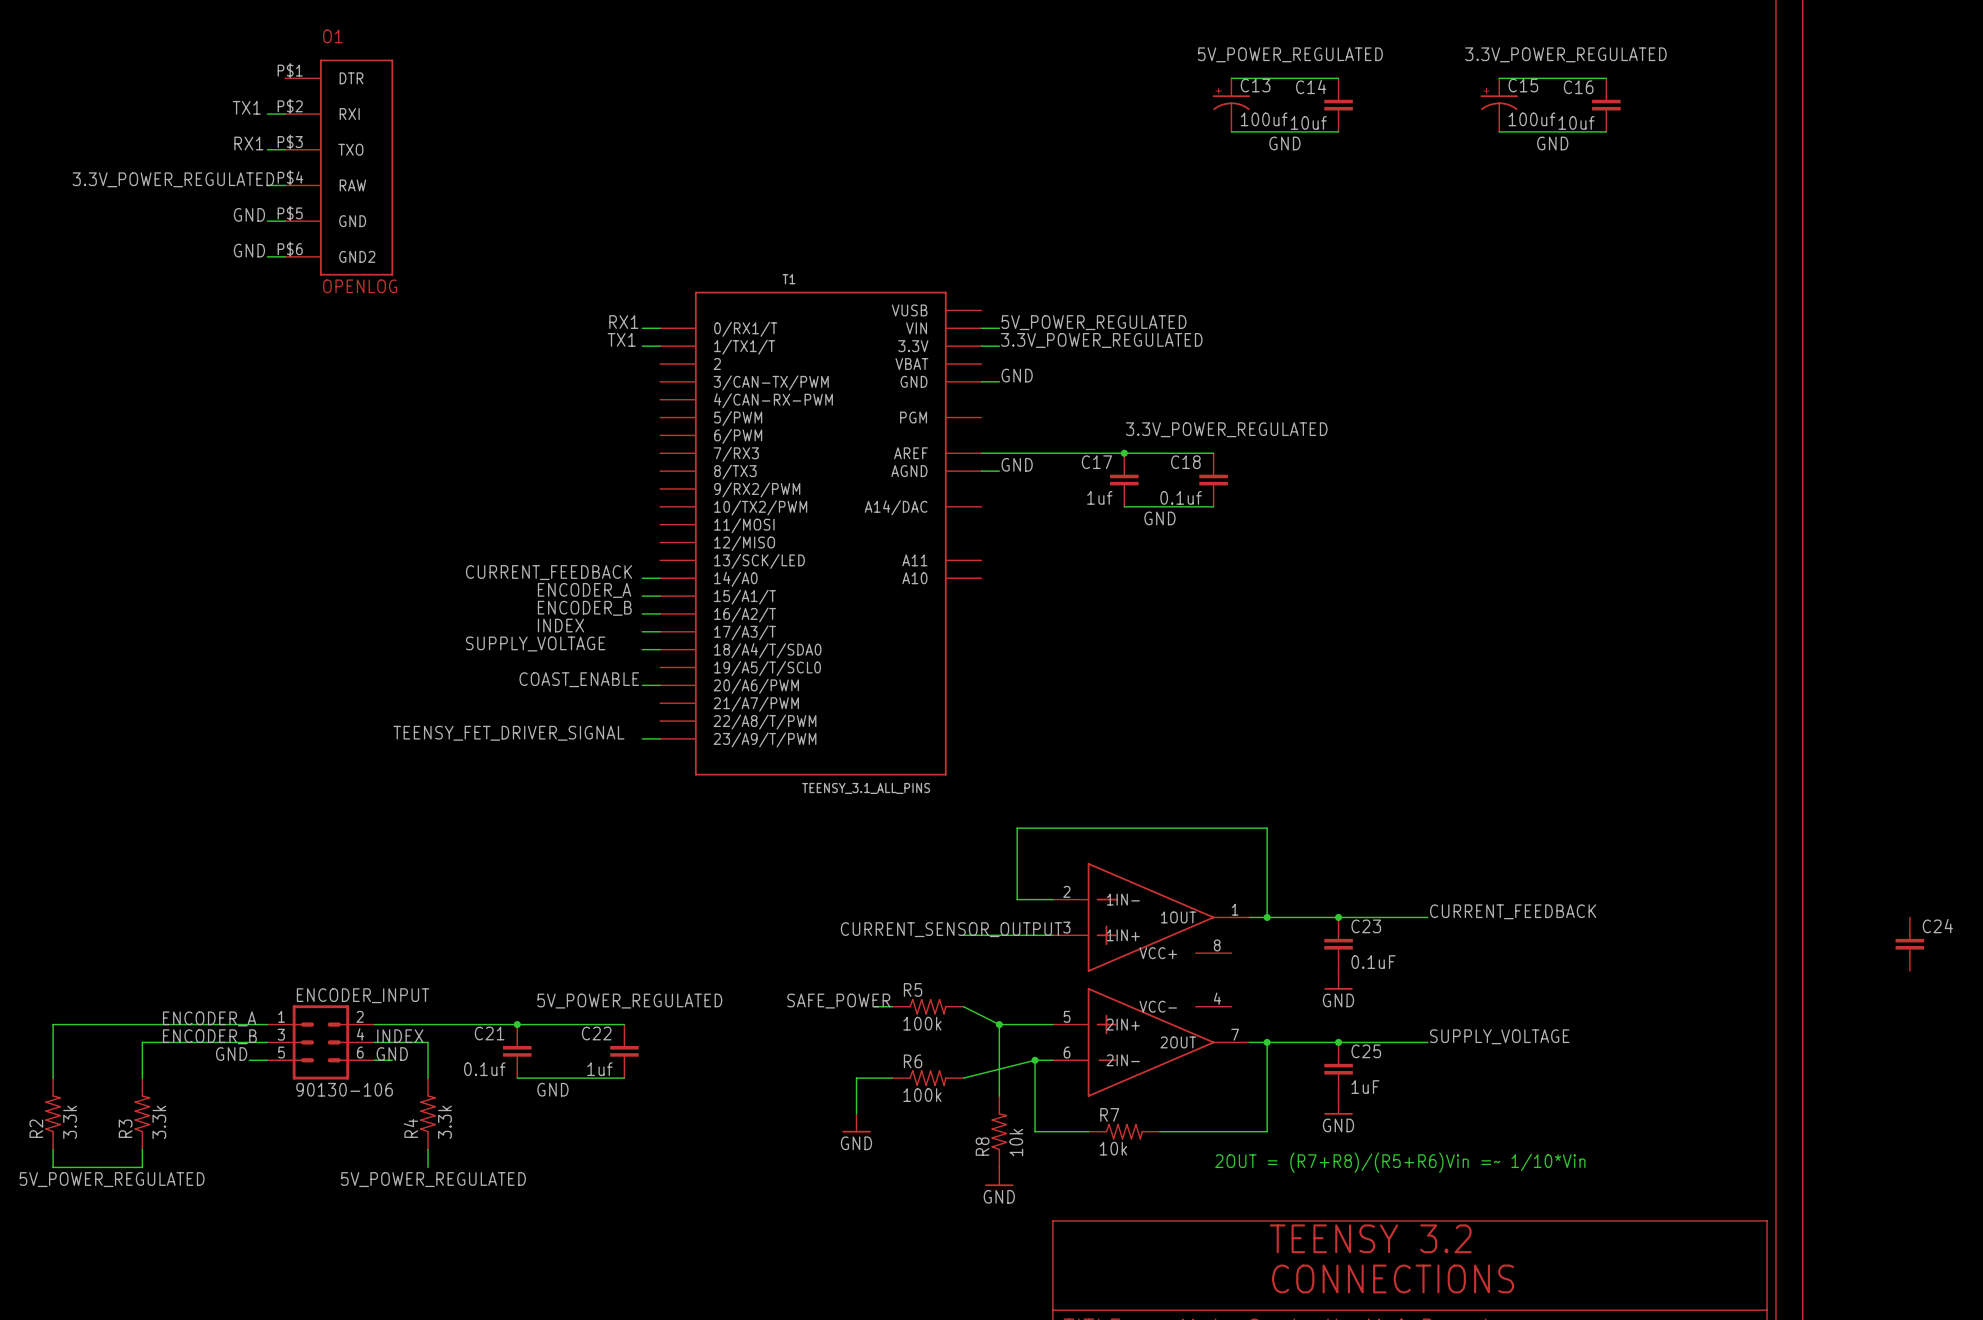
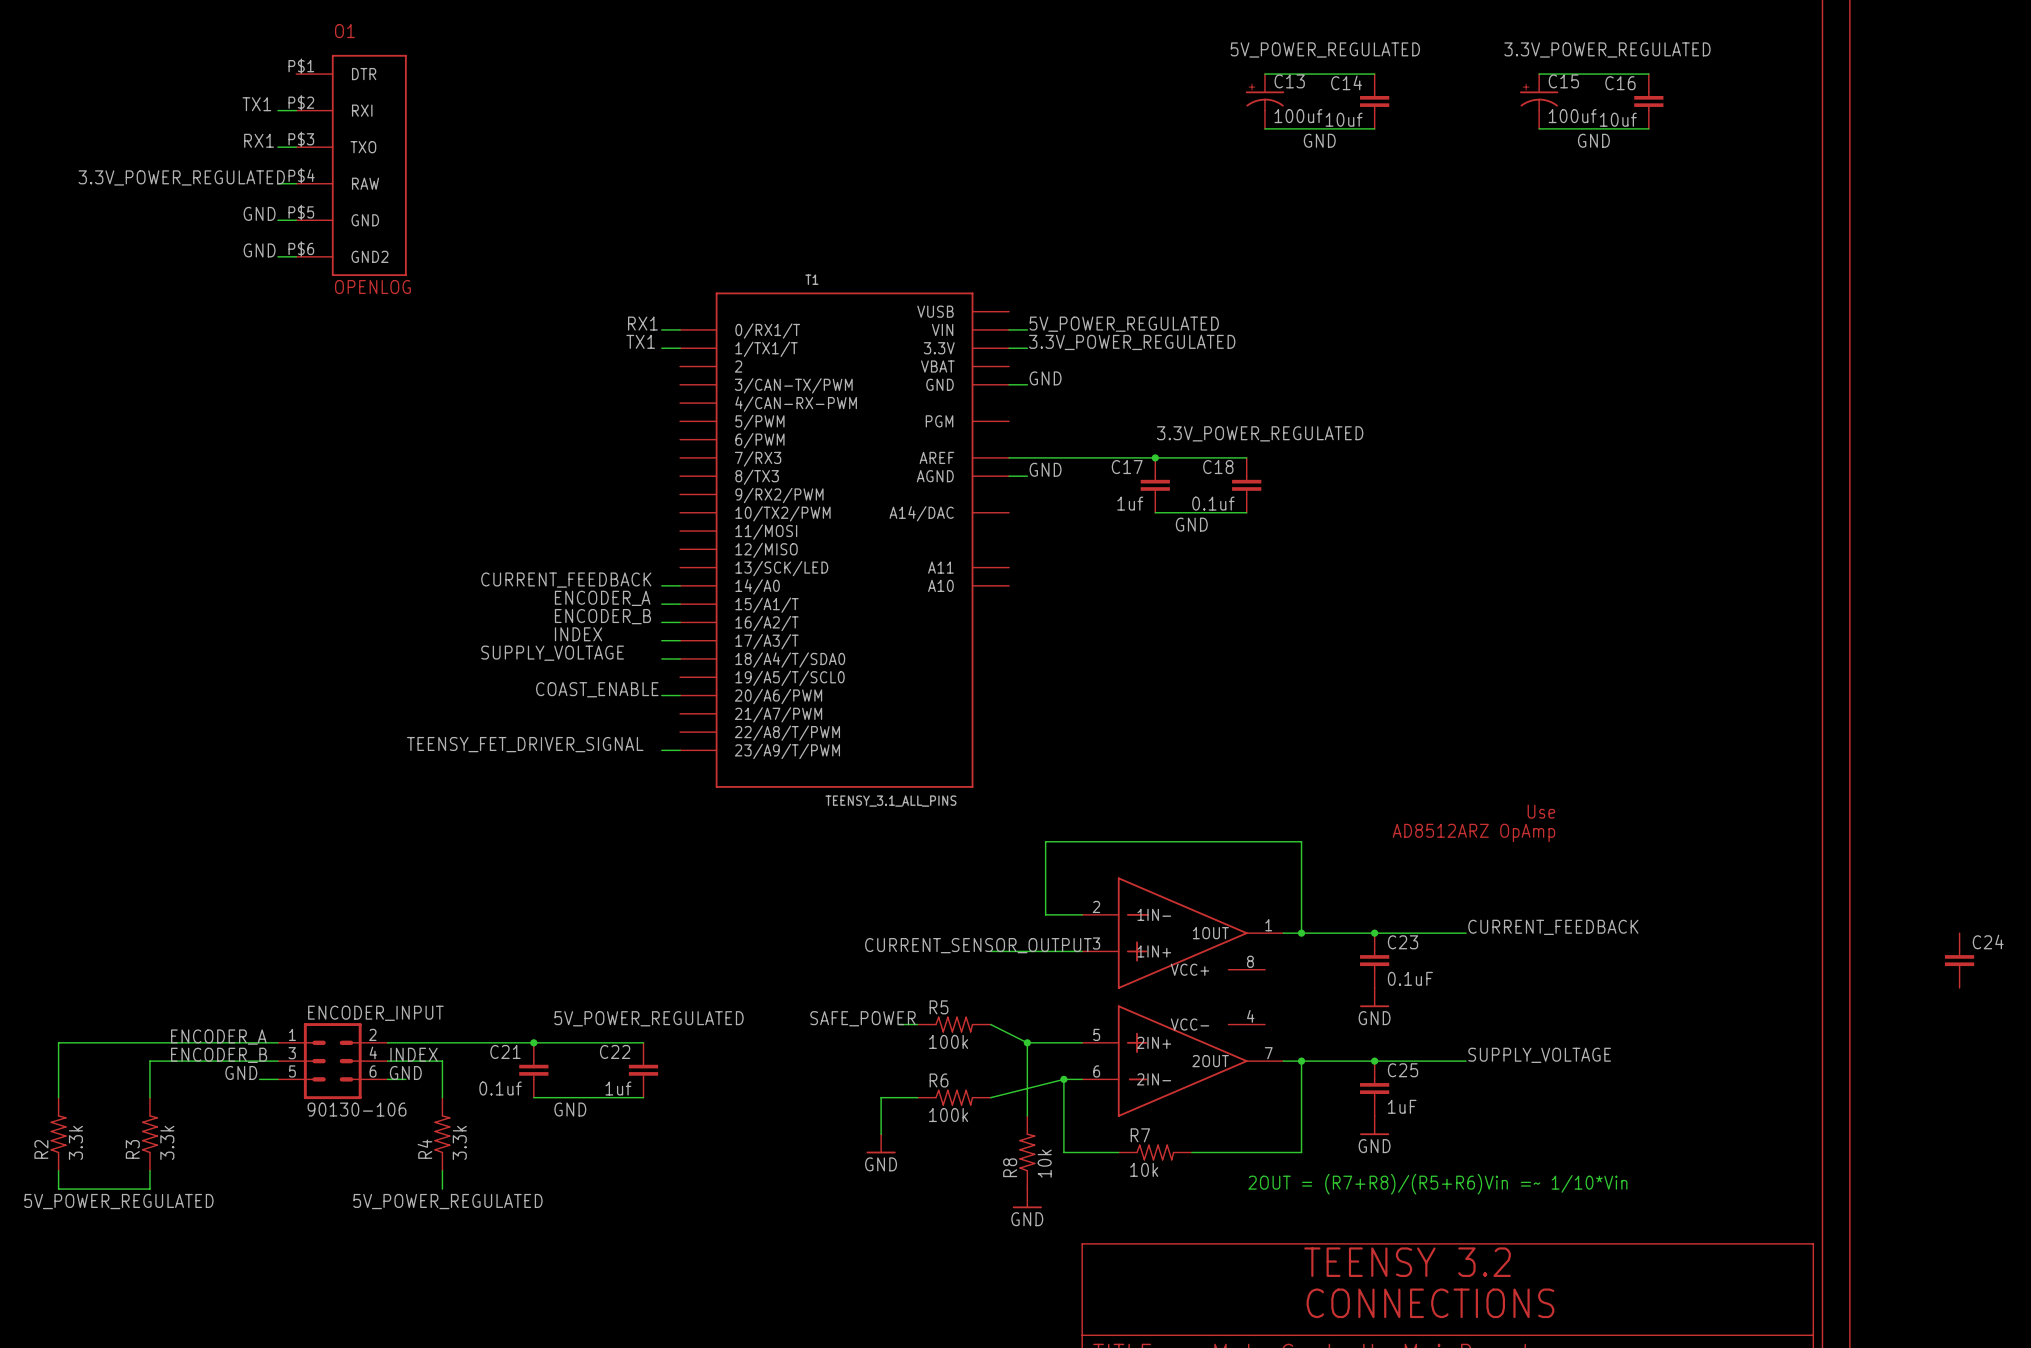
text: none -> Use (1541, 811)
text: none -> AD8512ARZ OpAmp (1473, 832)

